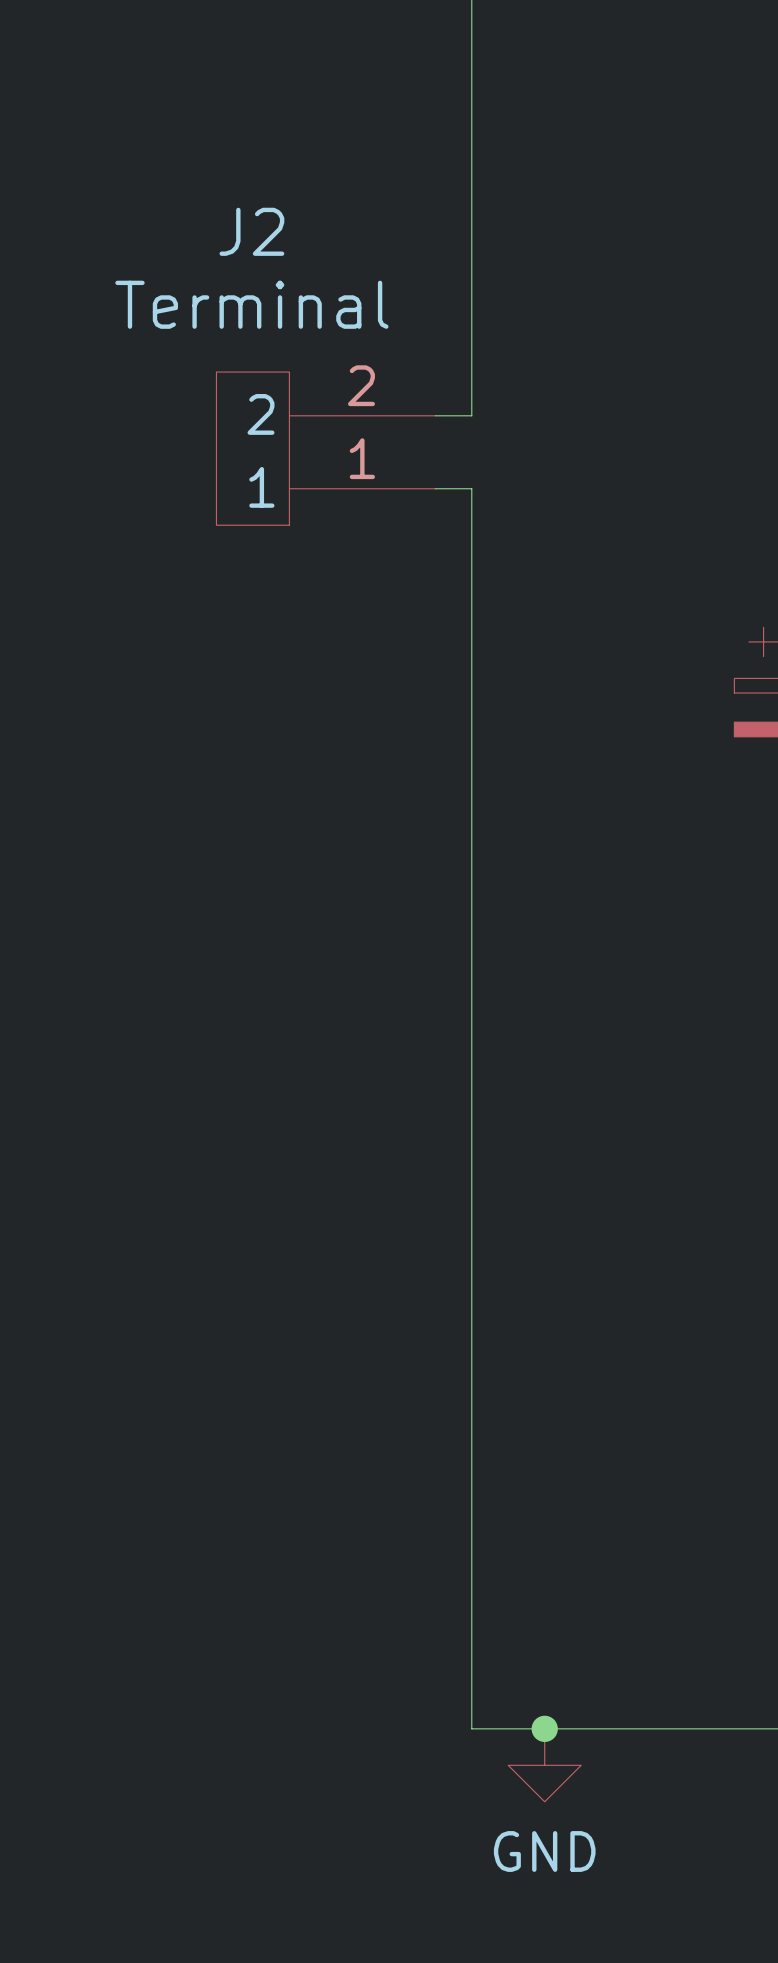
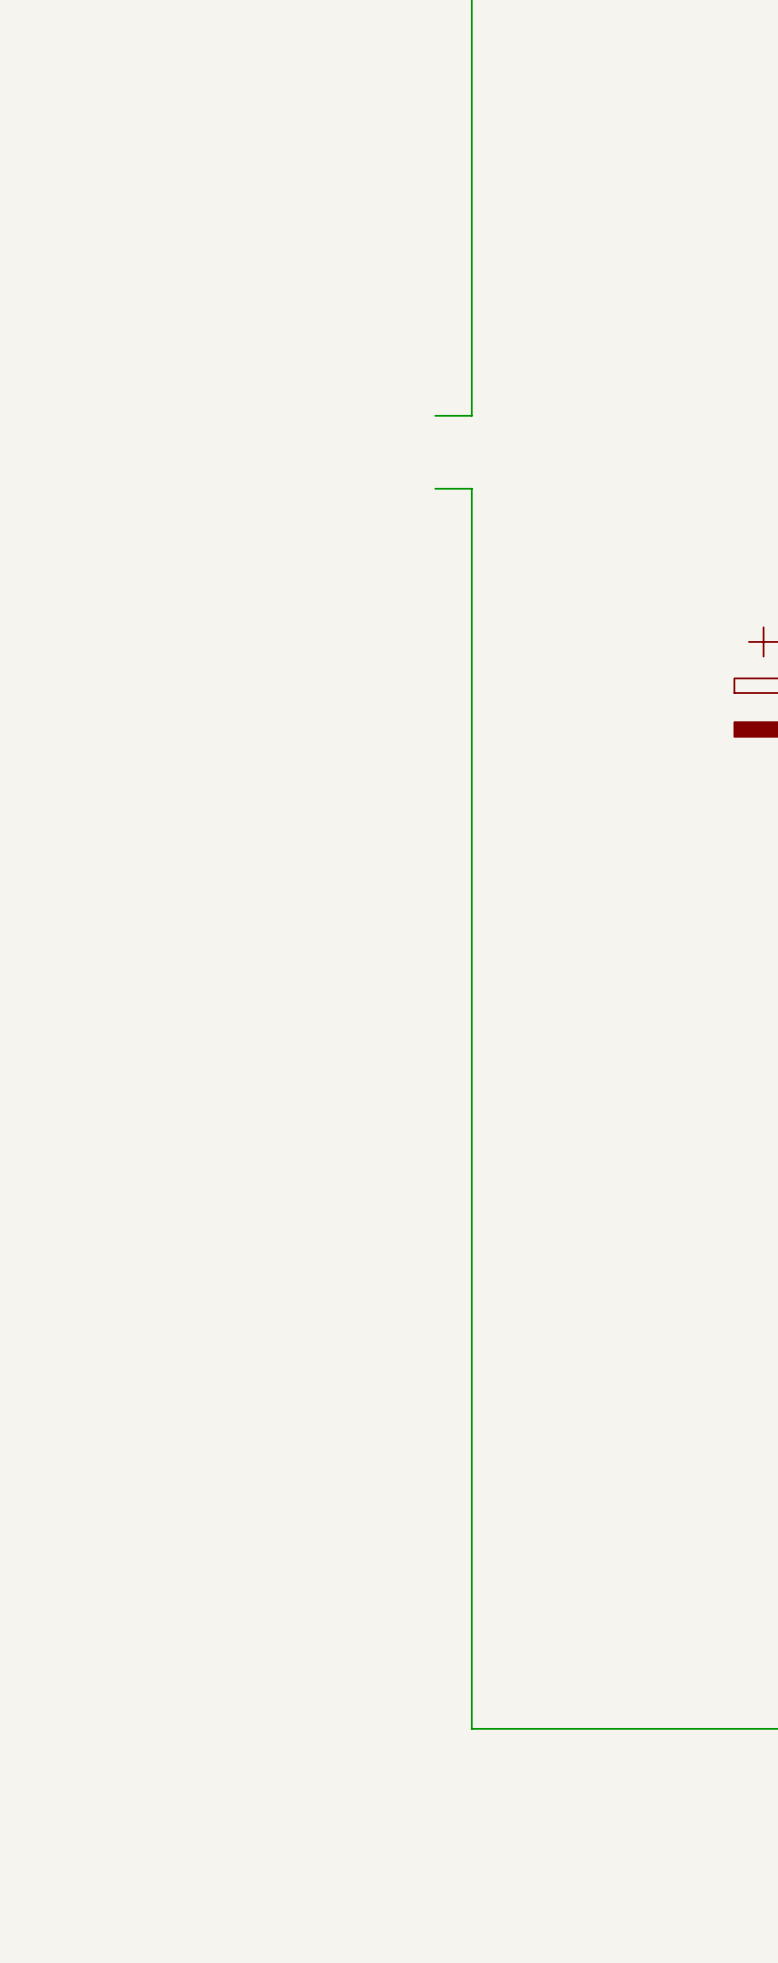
J2: Terminal (325, 448) -> none
junction: (544, 1728) -> none
power symbol: GND (544, 1765) -> none

